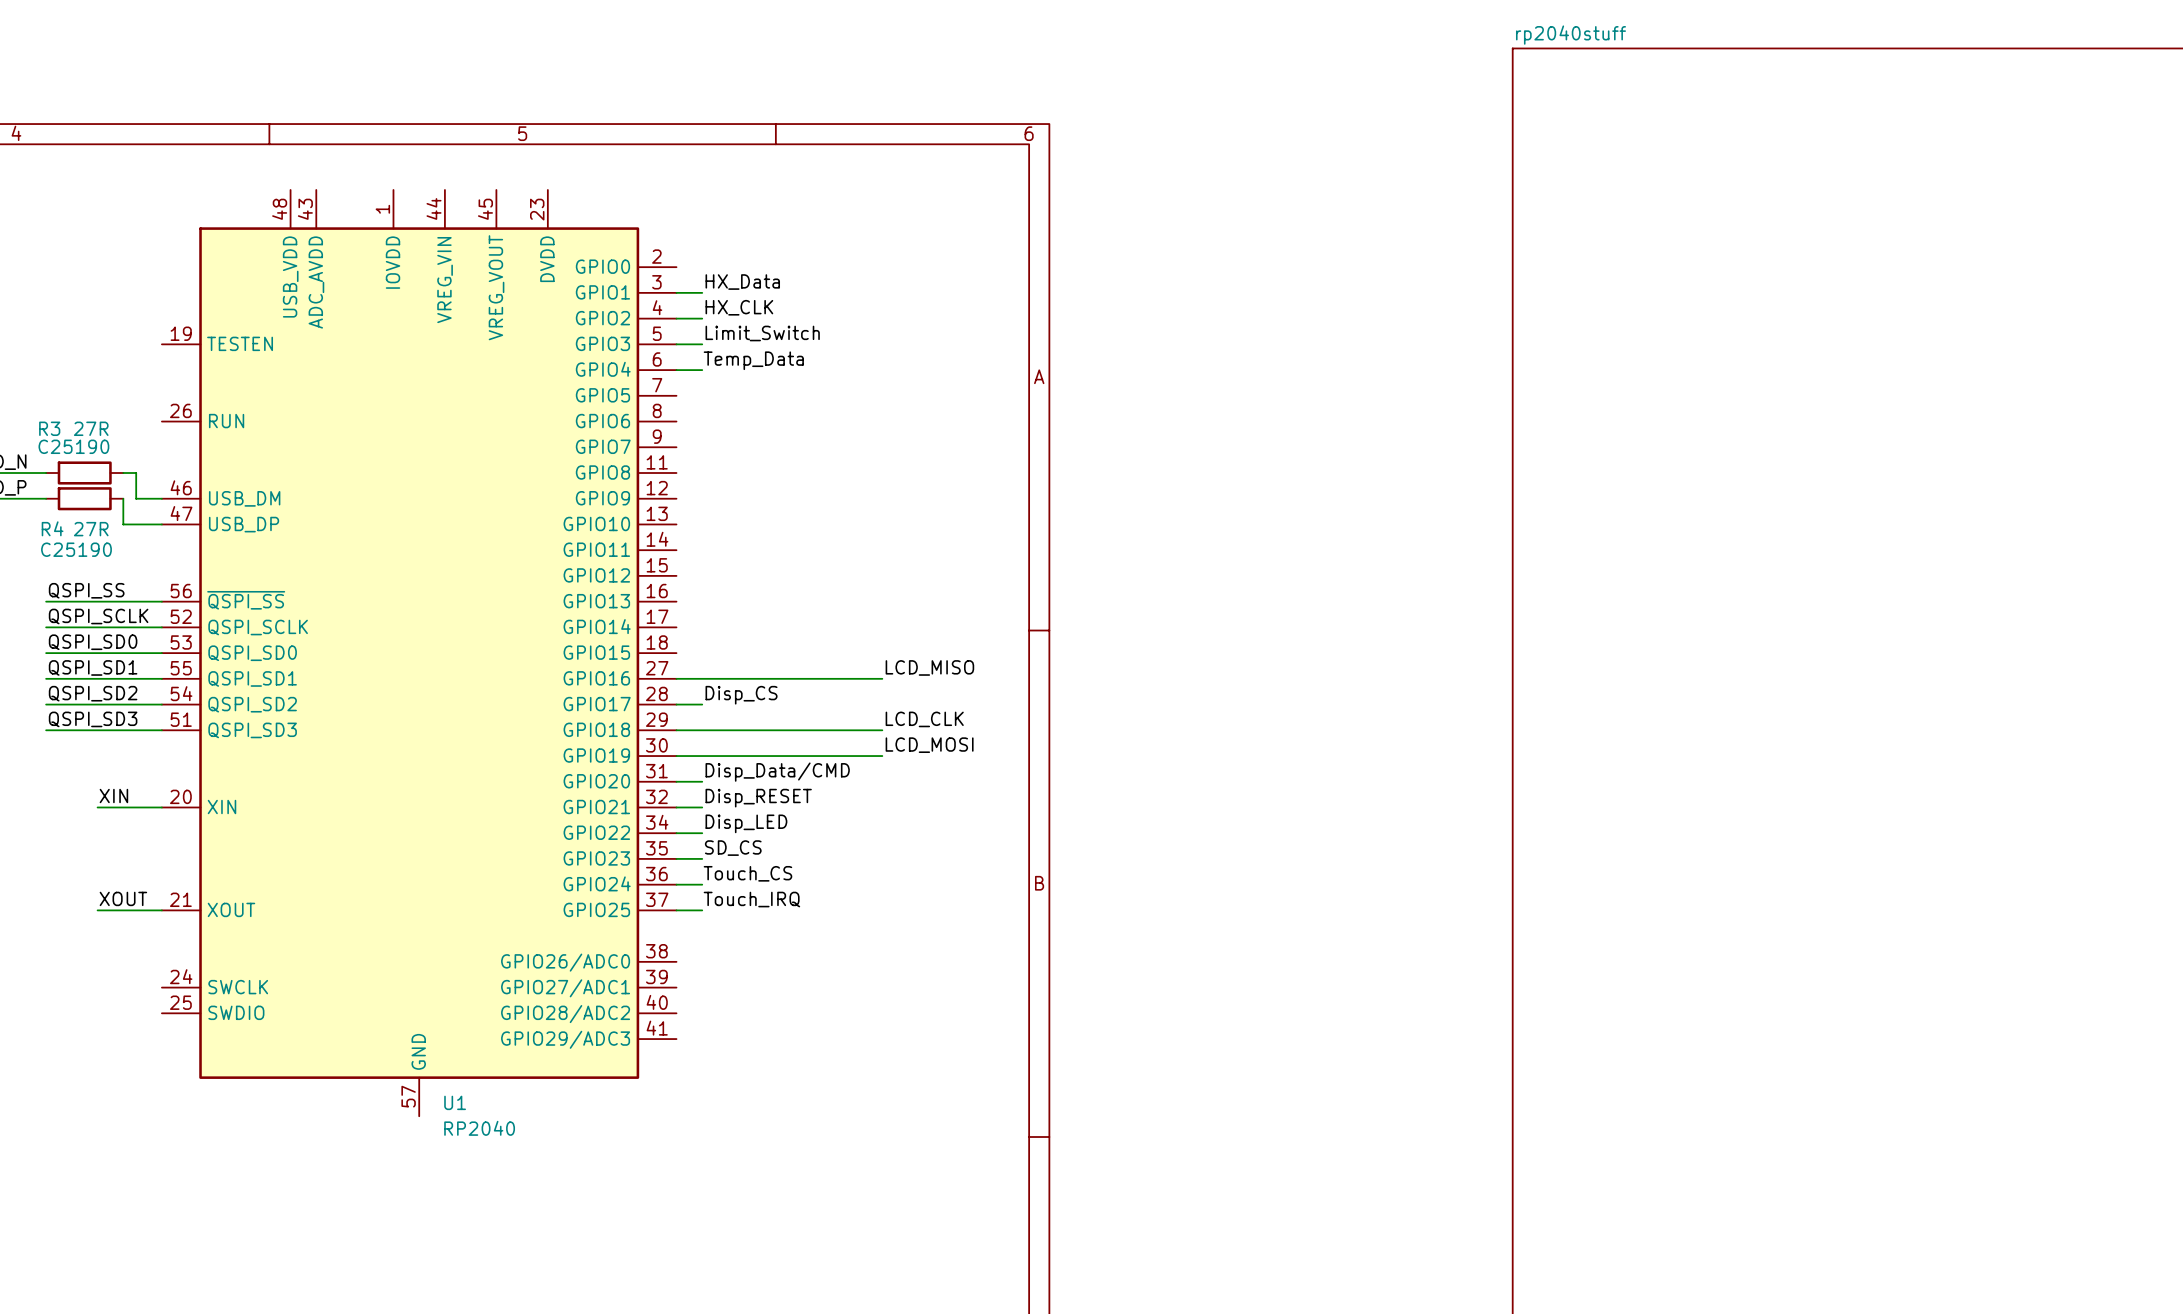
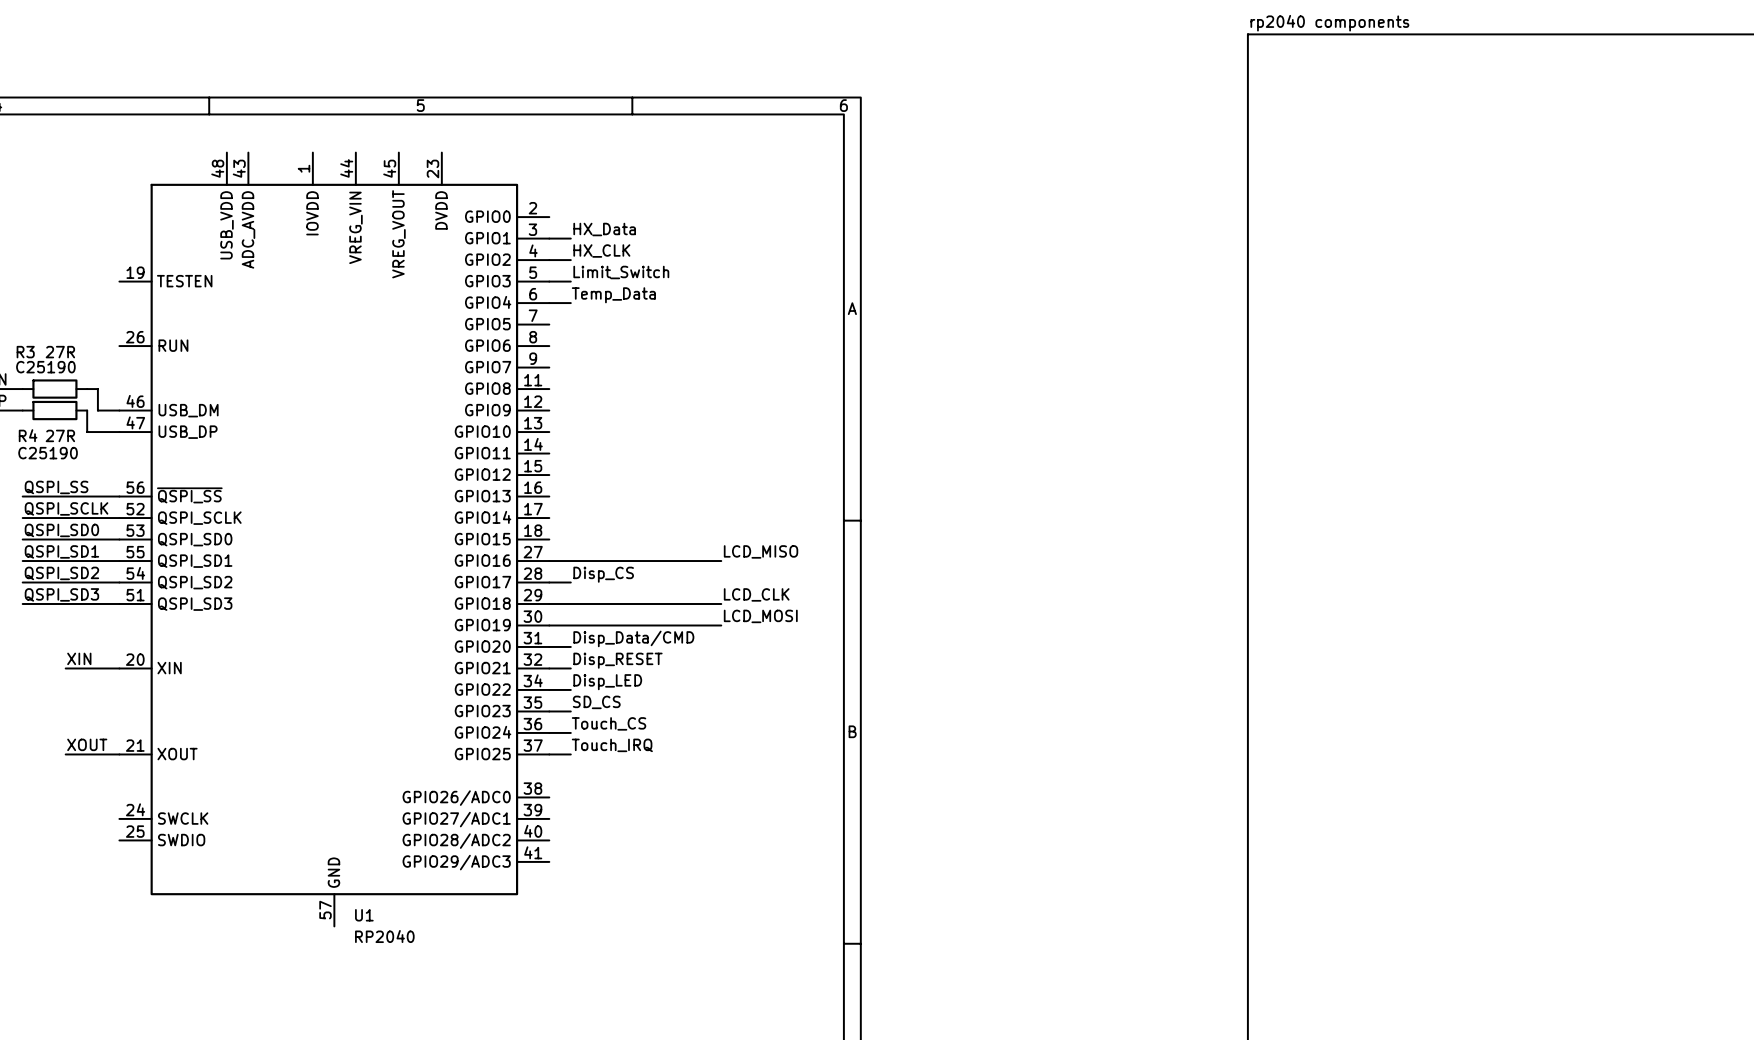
sheet rp2040stuff name: rp2040stuff (1571, 35) -> rp2040 components (1329, 23)

